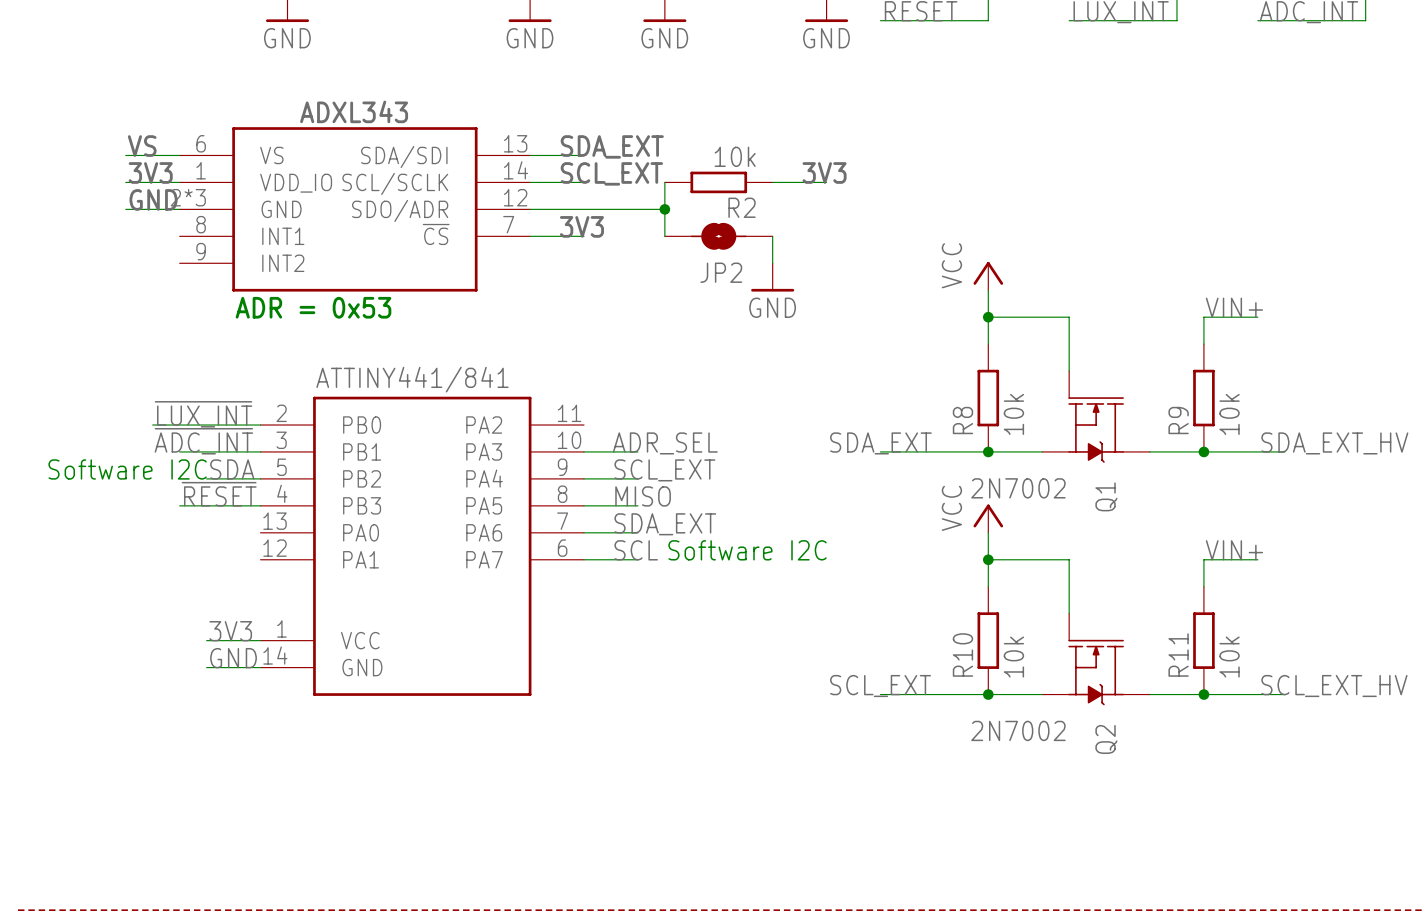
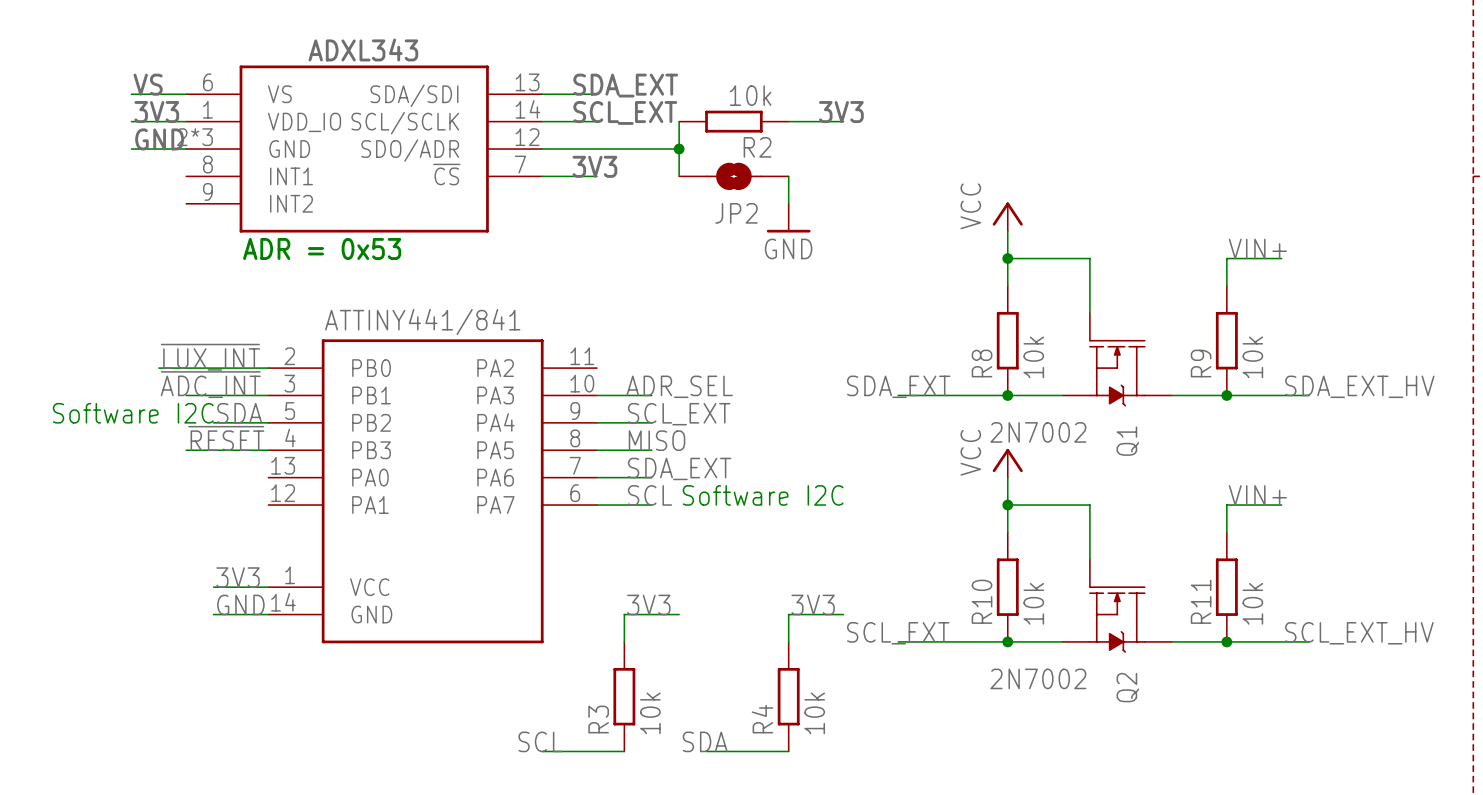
label: none -> 3V3 (648, 604)
label: none -> 3V3 (813, 604)
wire: none -> (679, 614) (624, 614) (624, 641)
wire: none -> (843, 614) (788, 614) (788, 641)
R3: none -> 10k (624, 696)
R4: none -> 10k (788, 696)
label: none -> SCL (540, 741)
label: none -> SDA (705, 741)
wire: none -> (542, 751) (624, 751)
wire: none -> (706, 751) (788, 751)

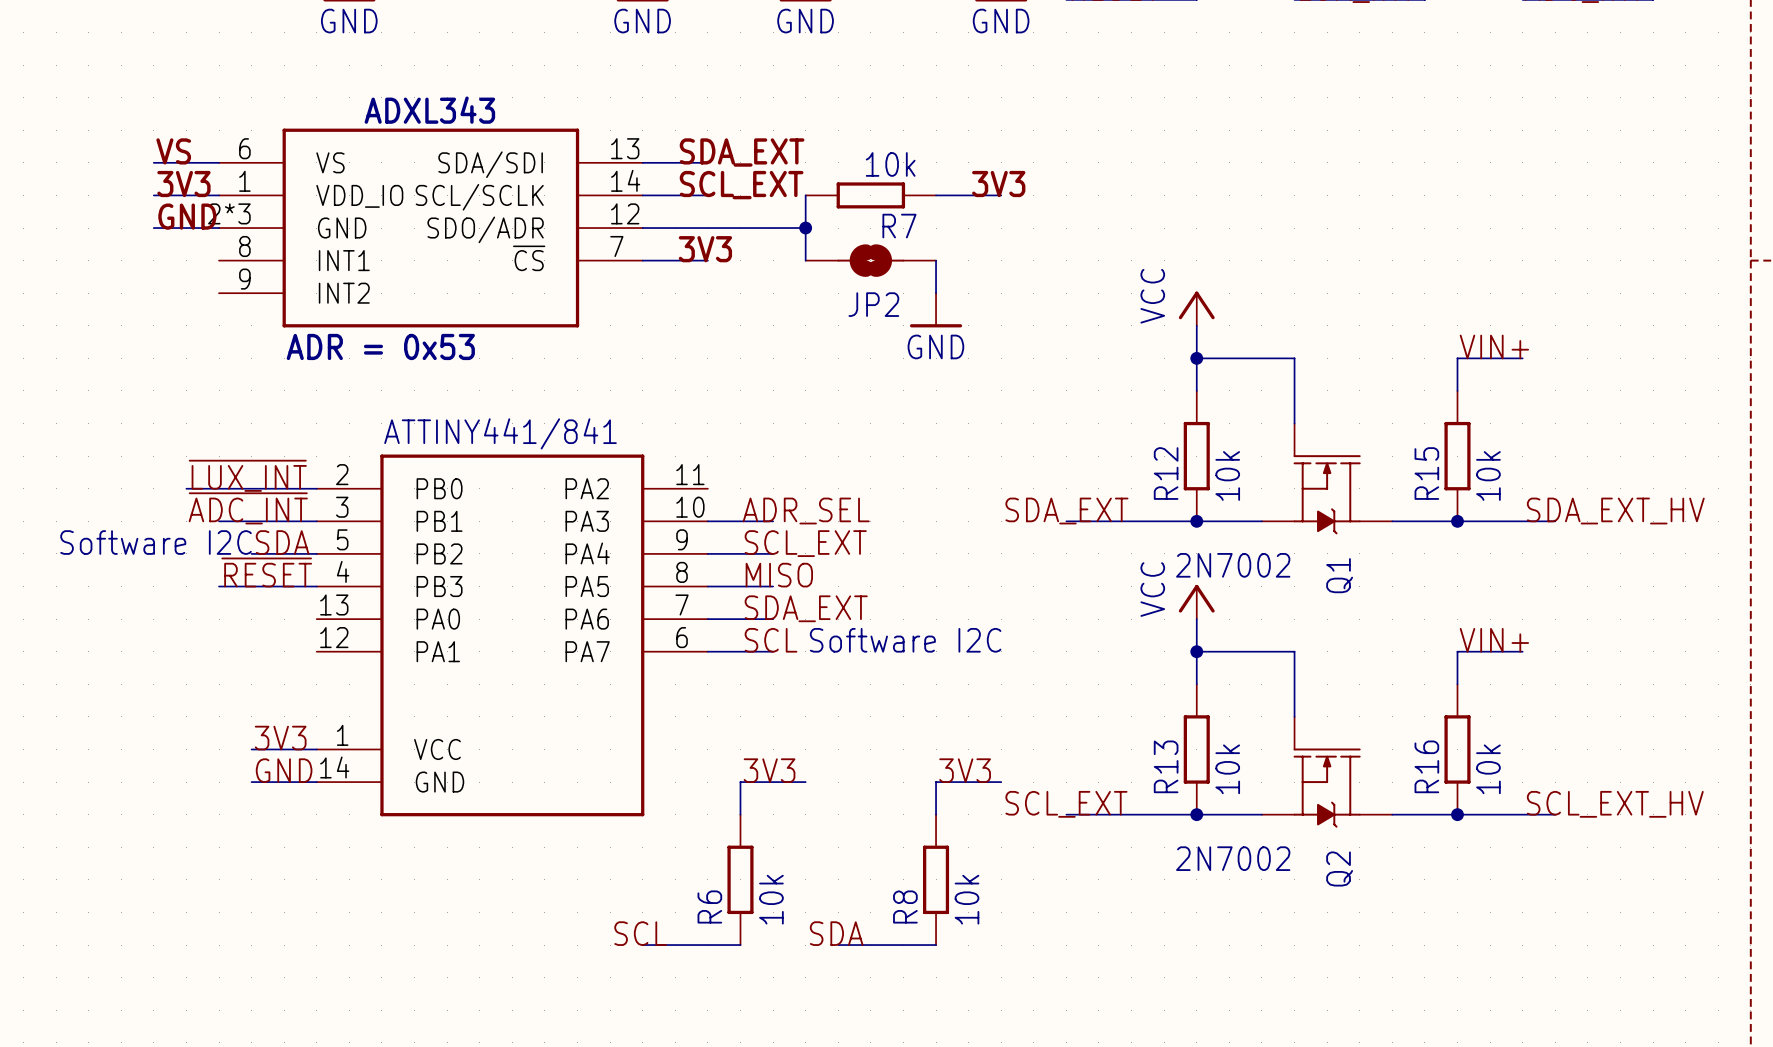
R2 name: R2 (757, 147) -> R7 (899, 226)
R8 name: R8 (982, 363) -> R12 (1166, 473)
R9 name: R9 (1201, 363) -> R15 (1426, 473)
R10 name: R10 (982, 601) -> R13 (1166, 766)
R11 name: R11 (1201, 601) -> R16 (1426, 766)
R3 name: R3 (598, 719) -> R6 (709, 906)
R4 name: R4 (762, 719) -> R8 (905, 906)

